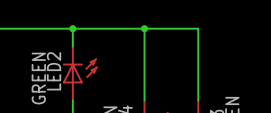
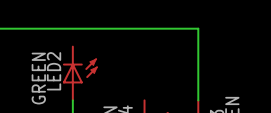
wire: (72, 28) (72, 46) -> none
junction: (72, 28) -> none
wire: (144, 28) (144, 100) -> none
junction: (144, 28) -> none

